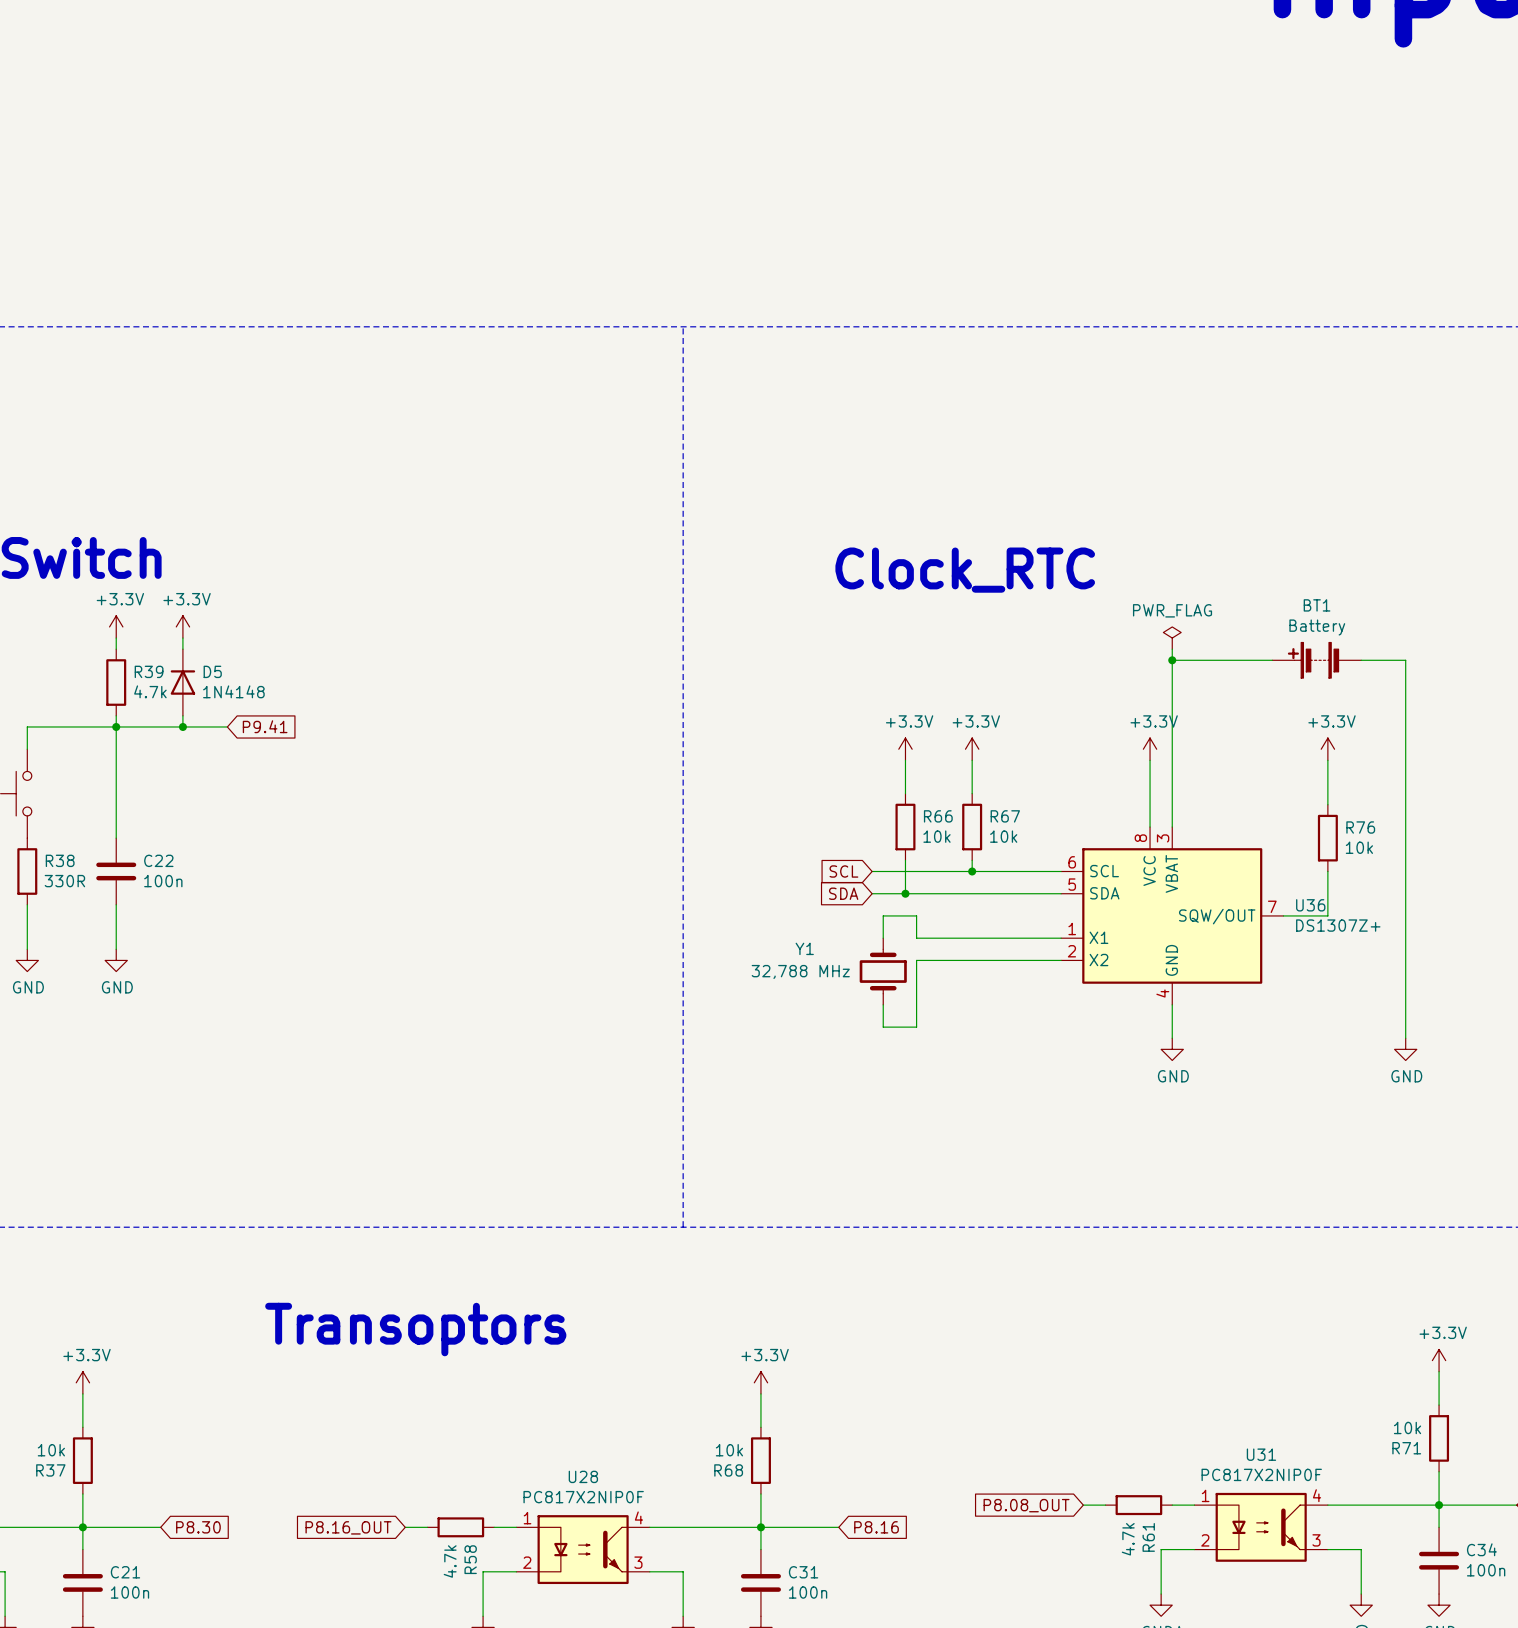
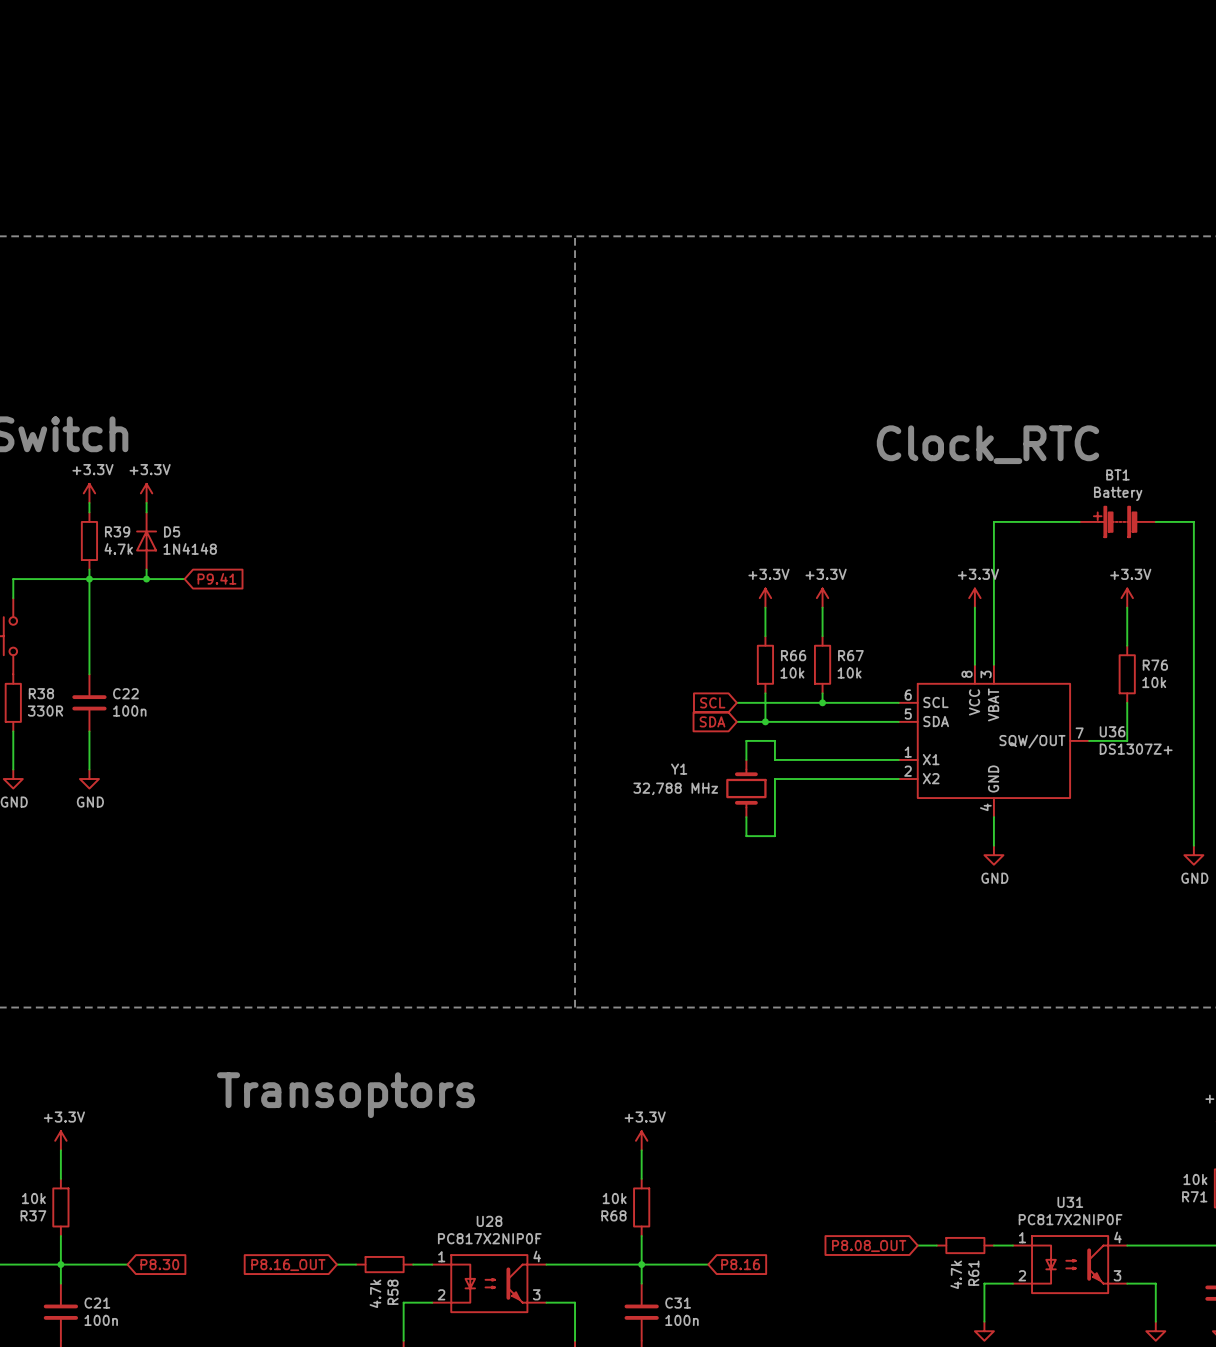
text position: Clock_RTC (965, 570) -> Clock_RTC (987, 444)
power symbol: PWR_FLAG (1172, 638) -> none
wire: (1172, 649) (1172, 660) -> none
junction: (1172, 660) -> none

